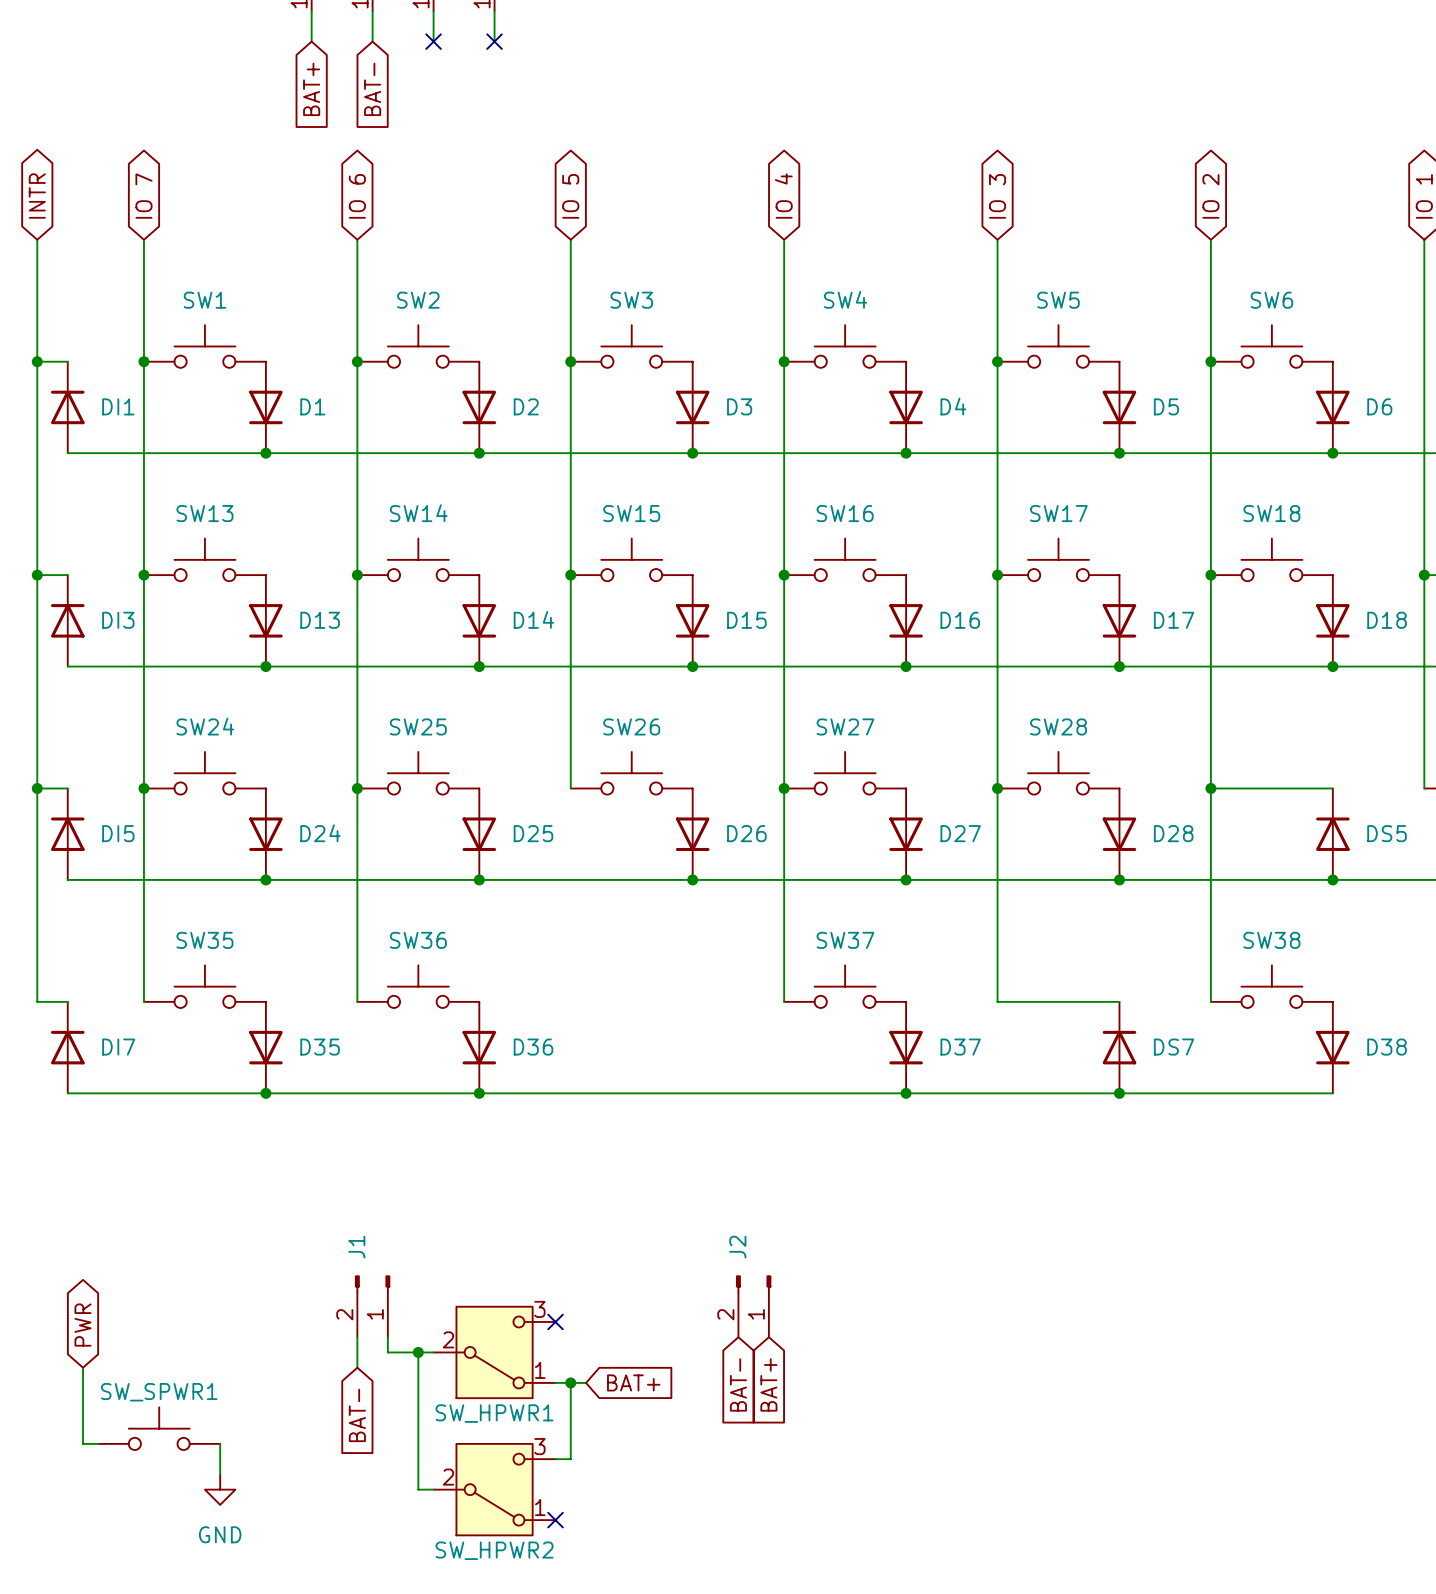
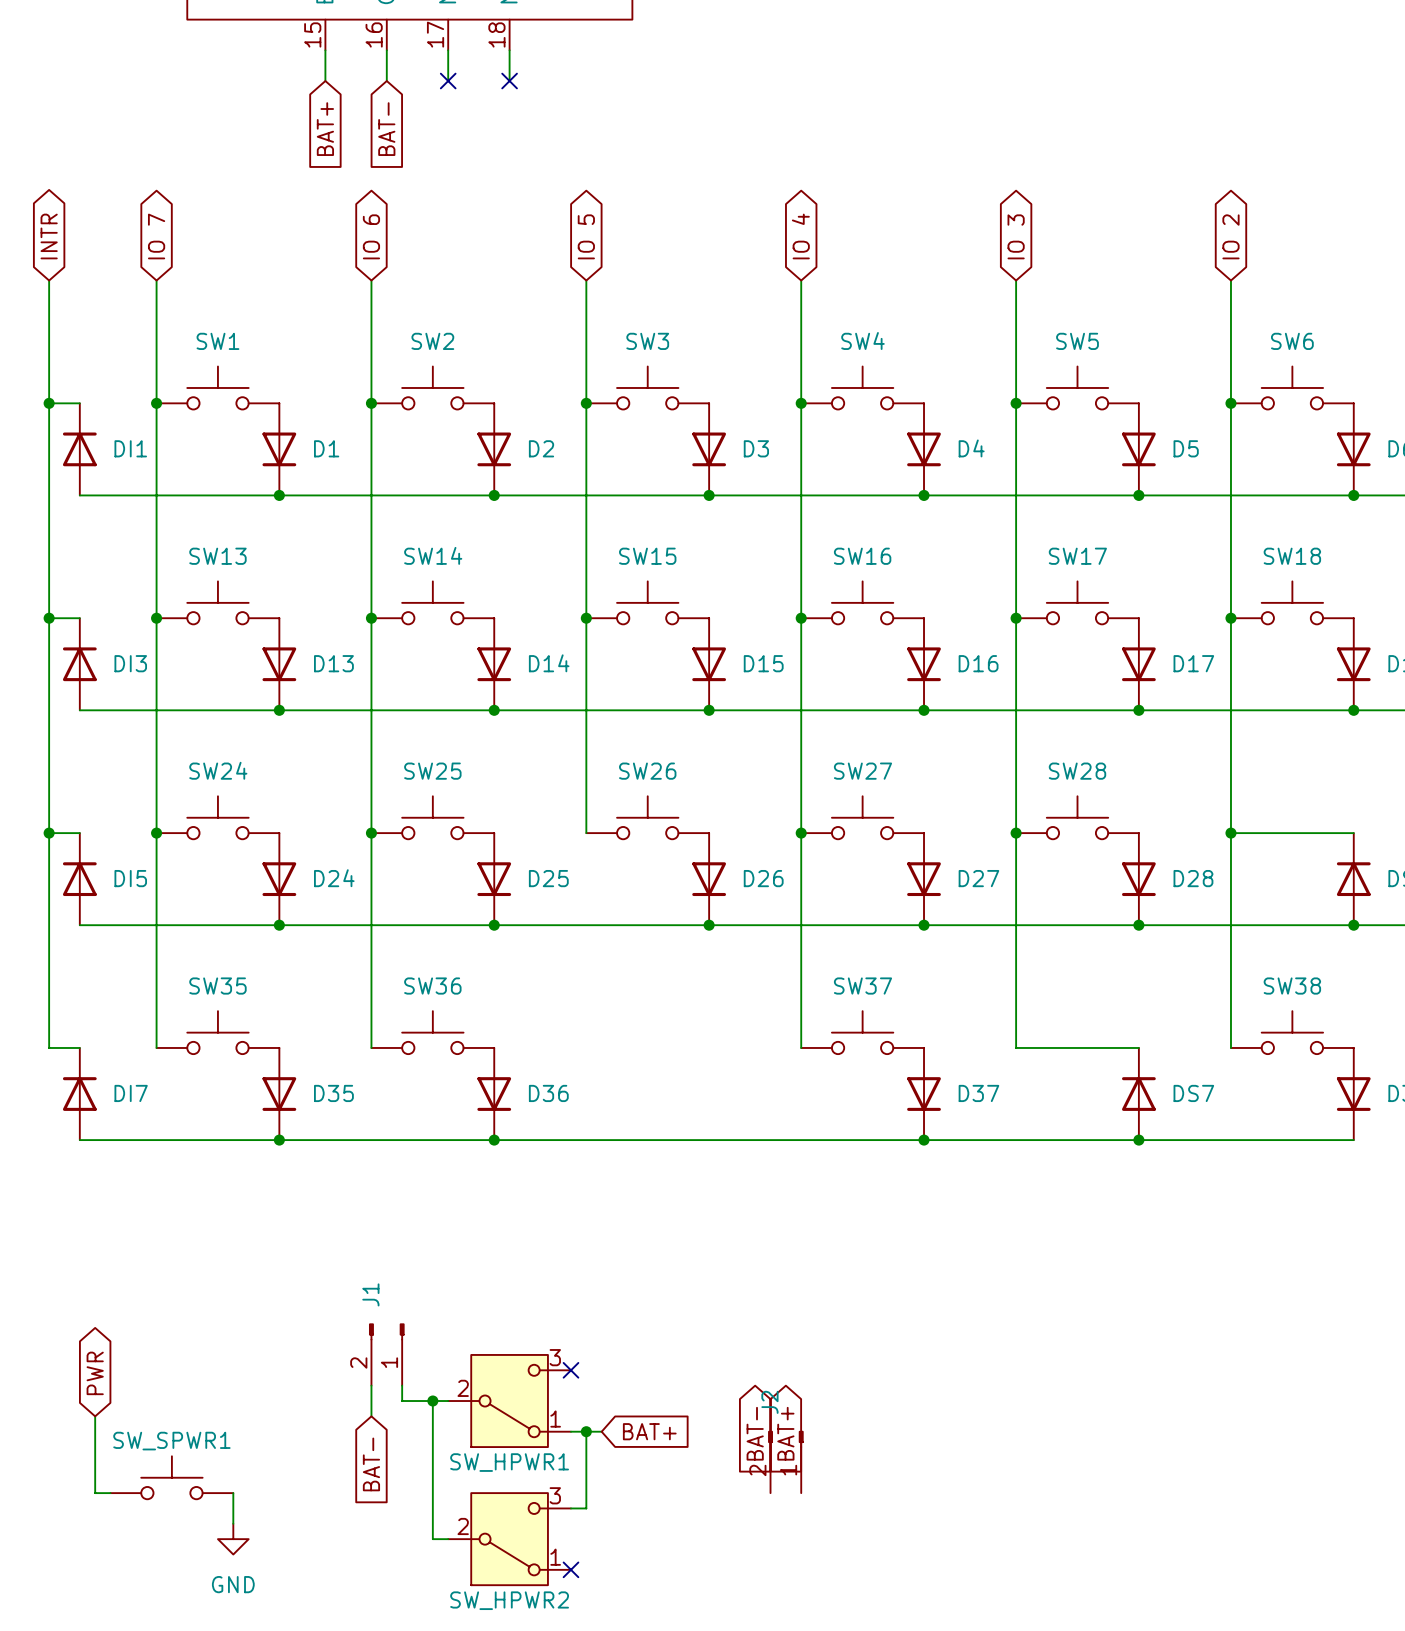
J2 position: (753, 1306) -> (785, 1461)

